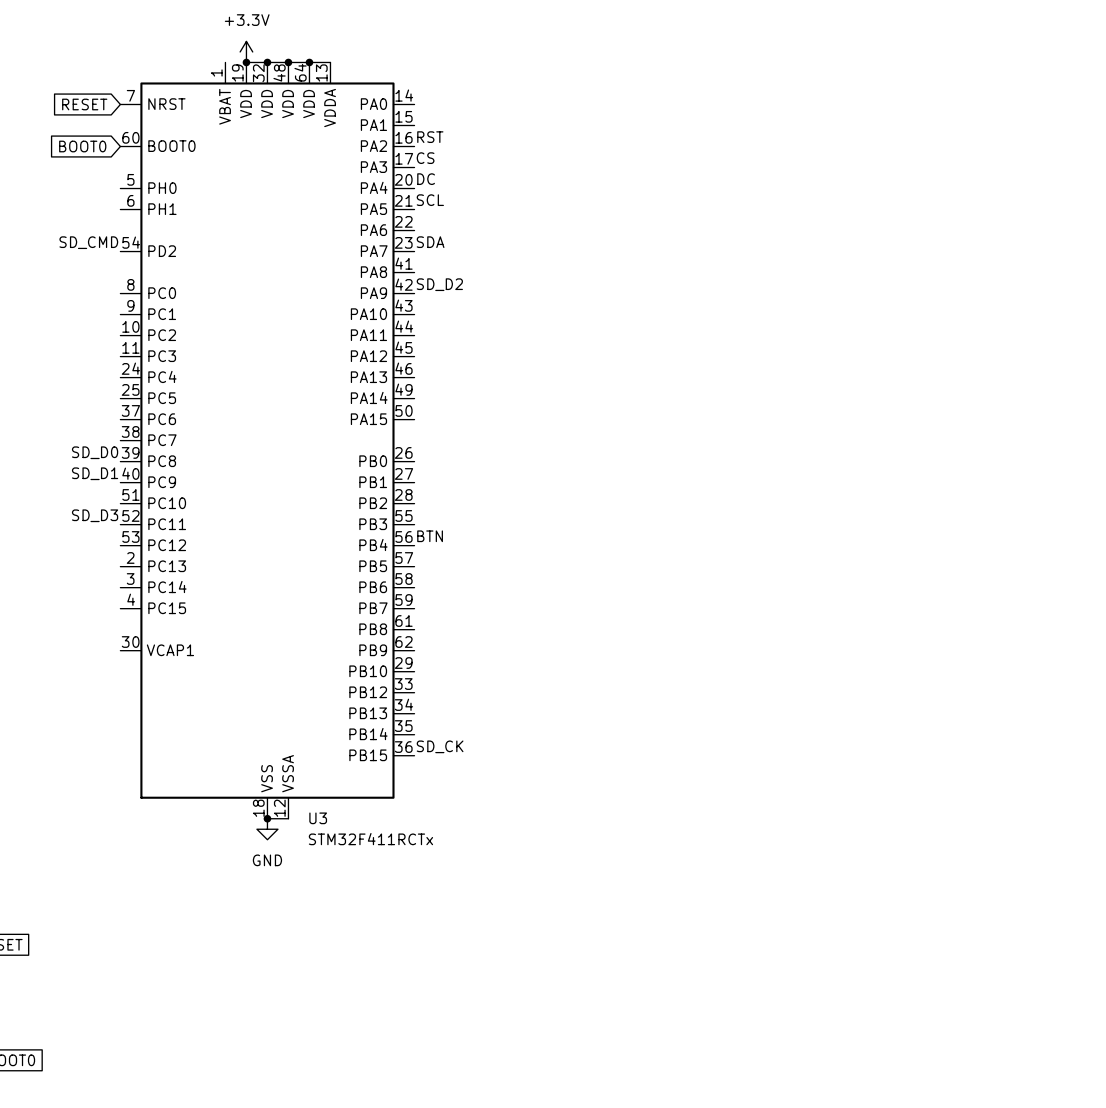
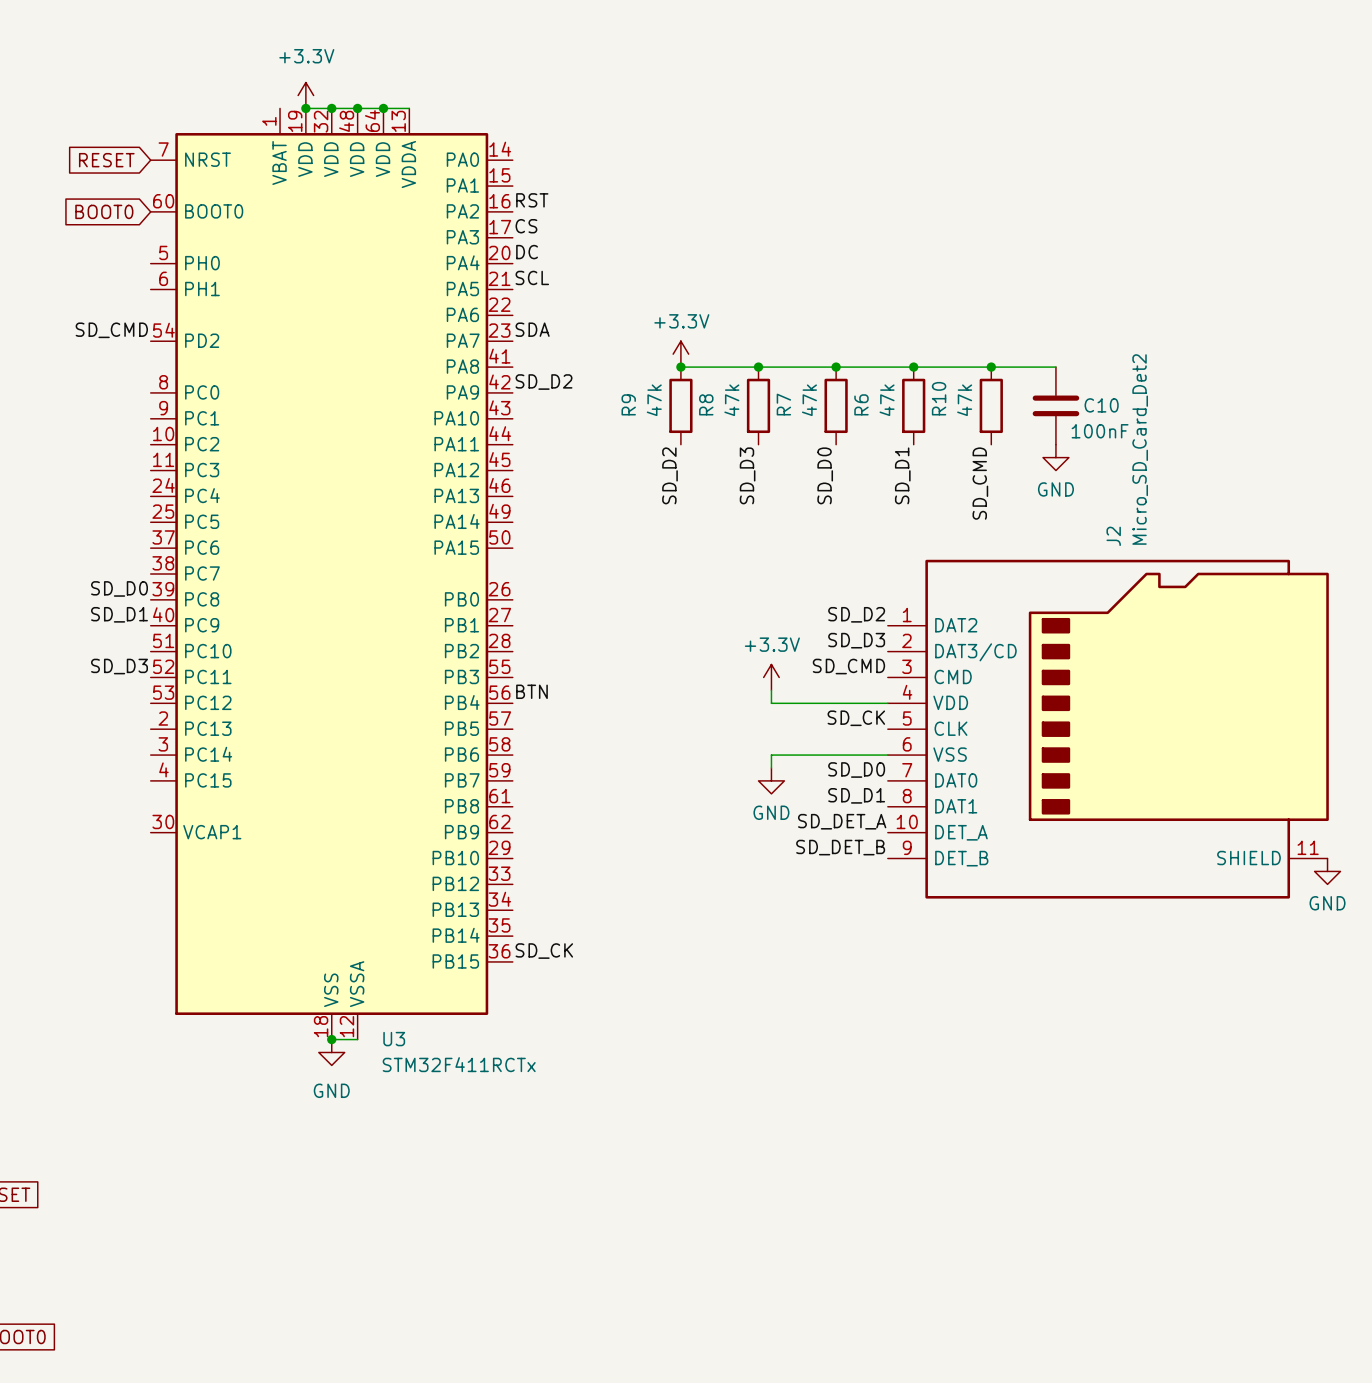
power symbol: none -> +3.3V (680, 354)
wire: none -> (680, 367) (1055, 367)
junction: none -> (680, 367)
junction: none -> (758, 367)
junction: none -> (836, 367)
junction: none -> (913, 367)
junction: none -> (991, 367)
R9: none -> 47k (680, 405)
R8: none -> 47k (758, 405)
R7: none -> 47k (836, 405)
R6: none -> 47k (913, 405)
R10: none -> 47k (991, 405)
C10: none -> 100nF (1055, 405)
power symbol: none -> GND (1055, 457)
label: none -> SD_D2 (669, 475)
label: none -> SD_D3 (747, 475)
label: none -> SD_D0 (825, 475)
label: none -> SD_D1 (902, 475)
label: none -> SD_CMD (980, 483)
label: none -> SD_D2 (856, 614)
label: none -> SD_D3 (856, 640)
label: none -> SD_CMD (848, 666)
power symbol: none -> +3.3V (771, 677)
wire: none -> (771, 690) (771, 703) (887, 703)
label: none -> SD_CK (856, 718)
J2: none -> Micro_SD_Card_Det2 (1108, 729)
wire: none -> (887, 755) (771, 755) (771, 767)
label: none -> SD_D0 (856, 769)
power symbol: none -> GND (771, 780)
label: none -> SD_D1 (856, 795)
label: none -> SD_DET_A (842, 821)
label: none -> SD_DET_B (840, 847)
power symbol: none -> GND (1327, 871)

